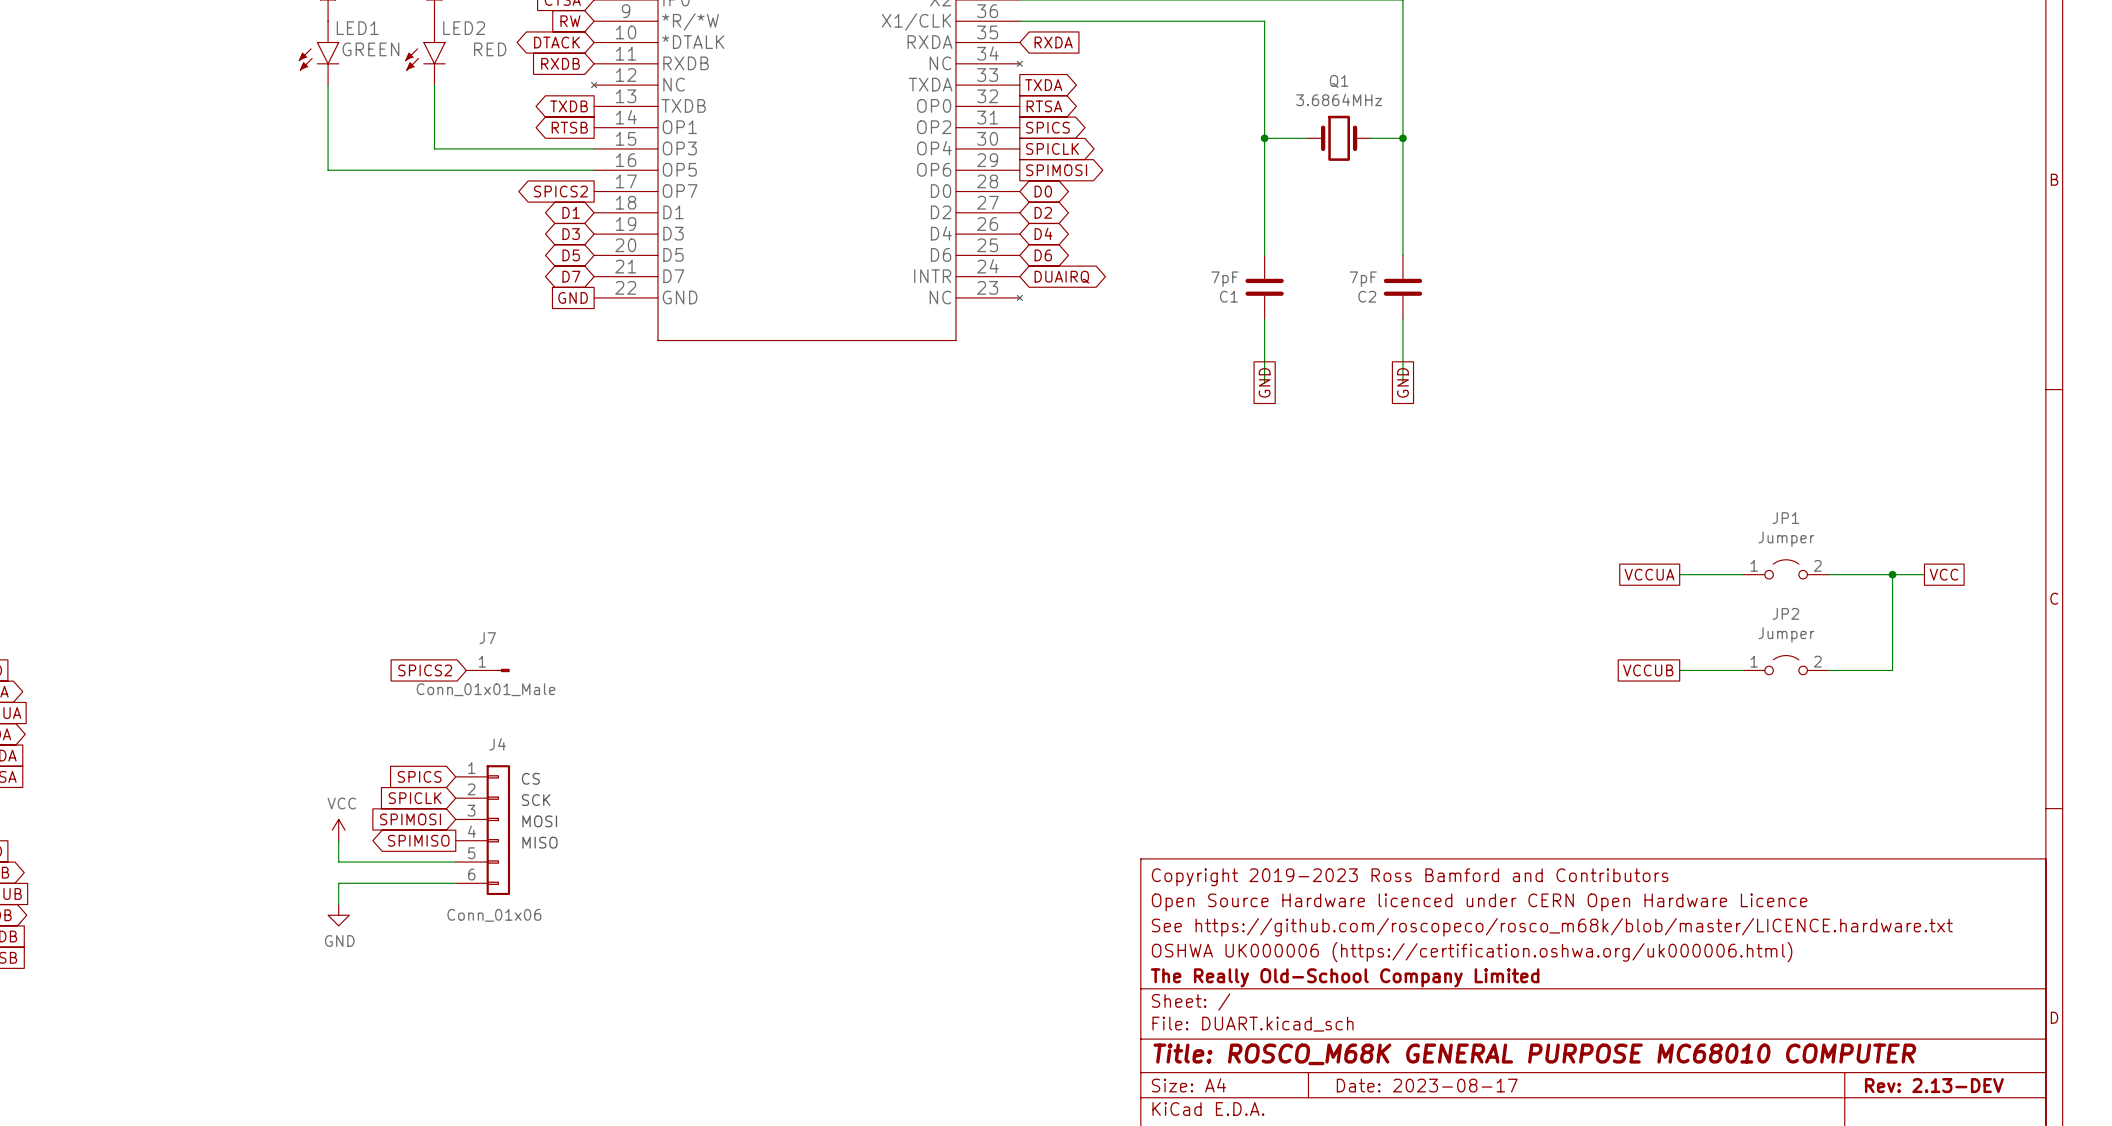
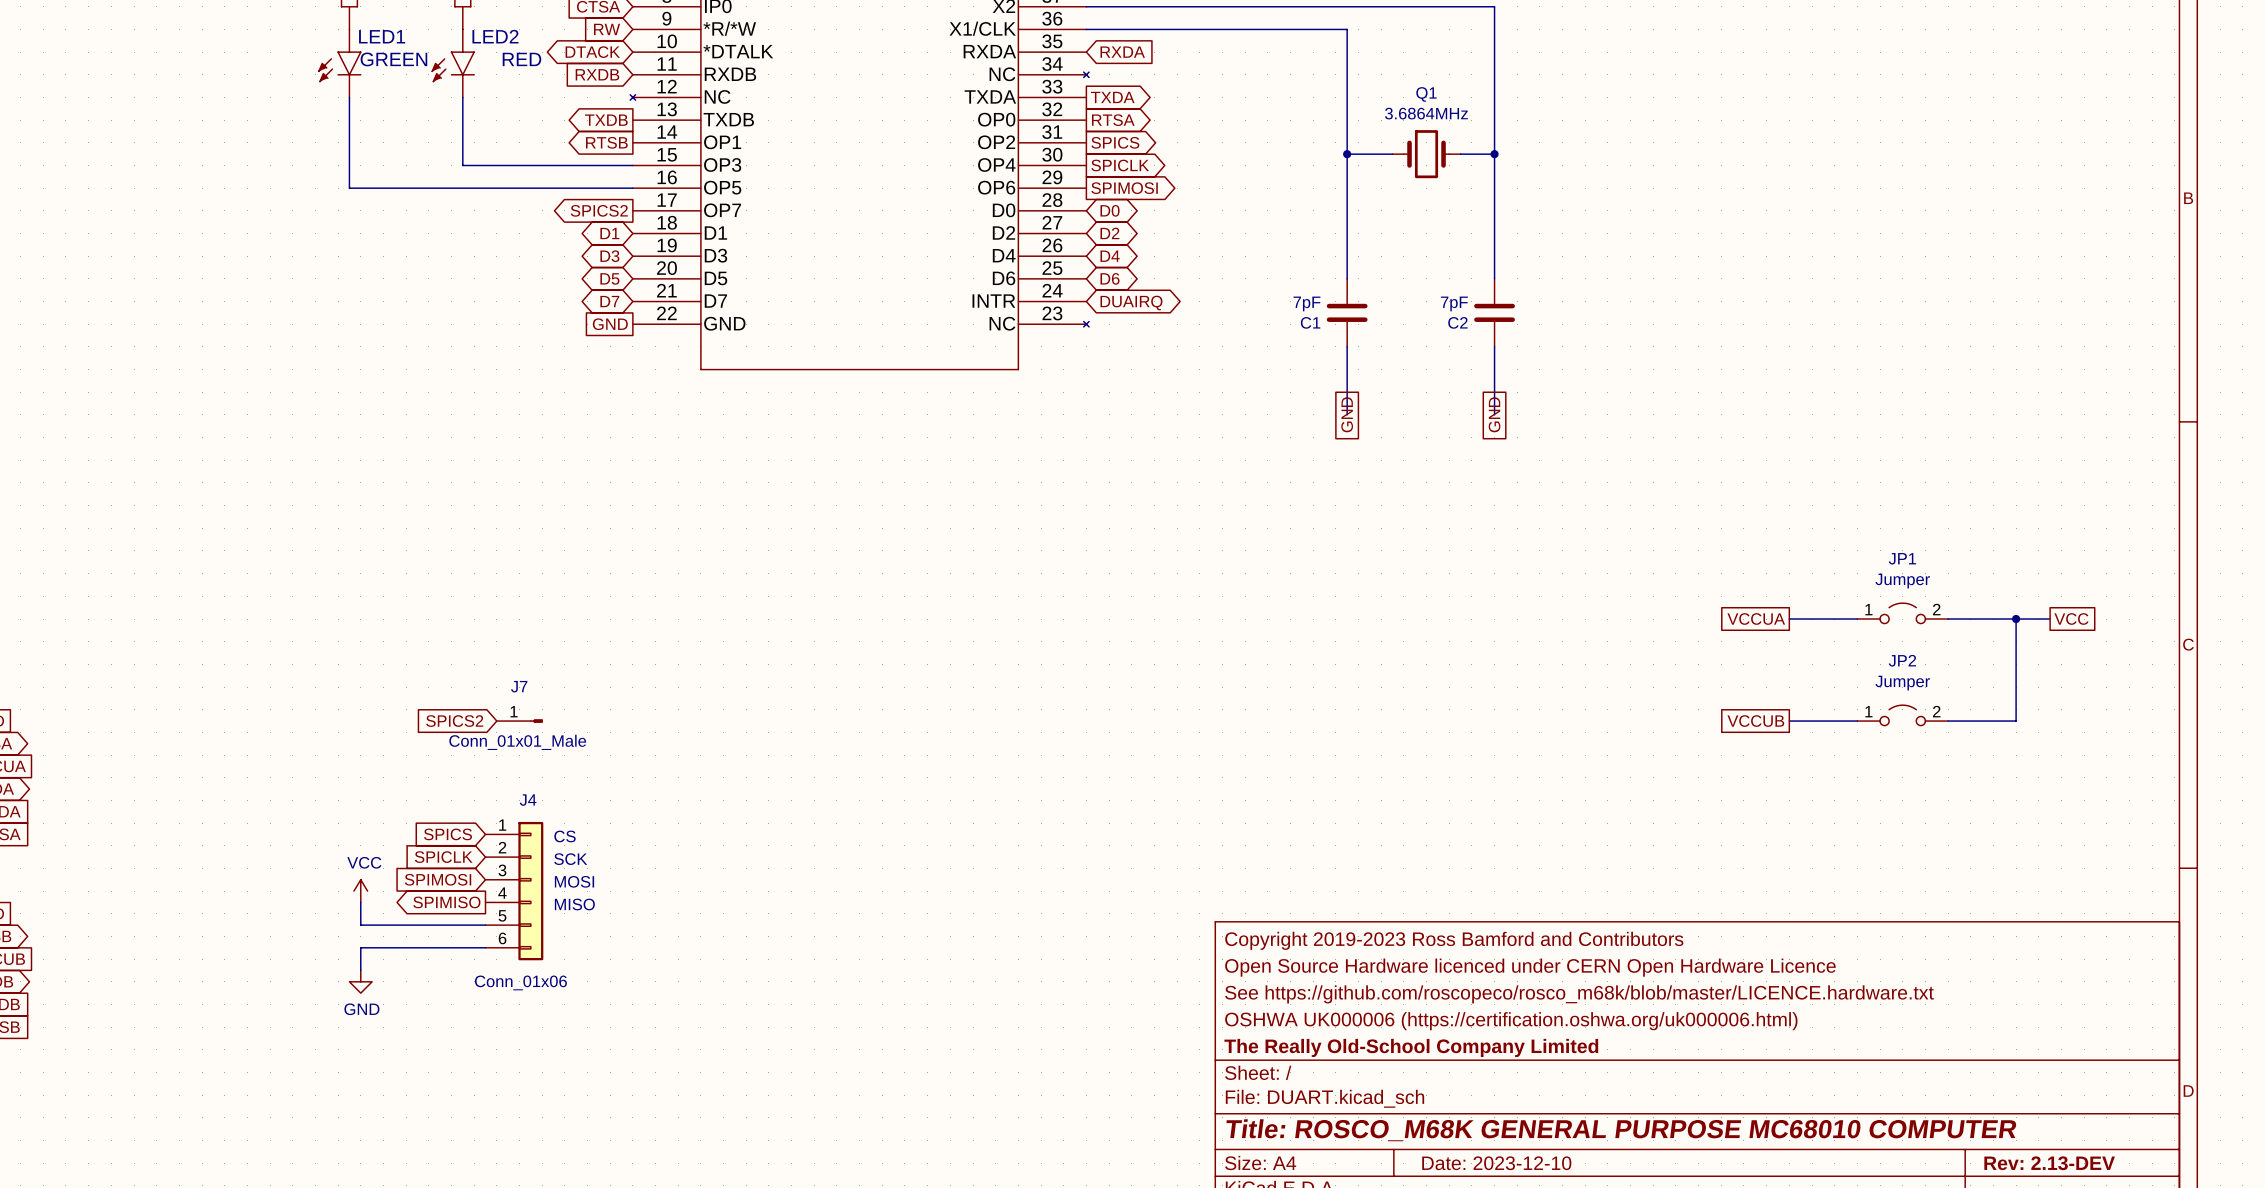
title block: Date: 2023-08-17 (1427, 1085) -> Date: 2023-12-10 (1496, 1163)

